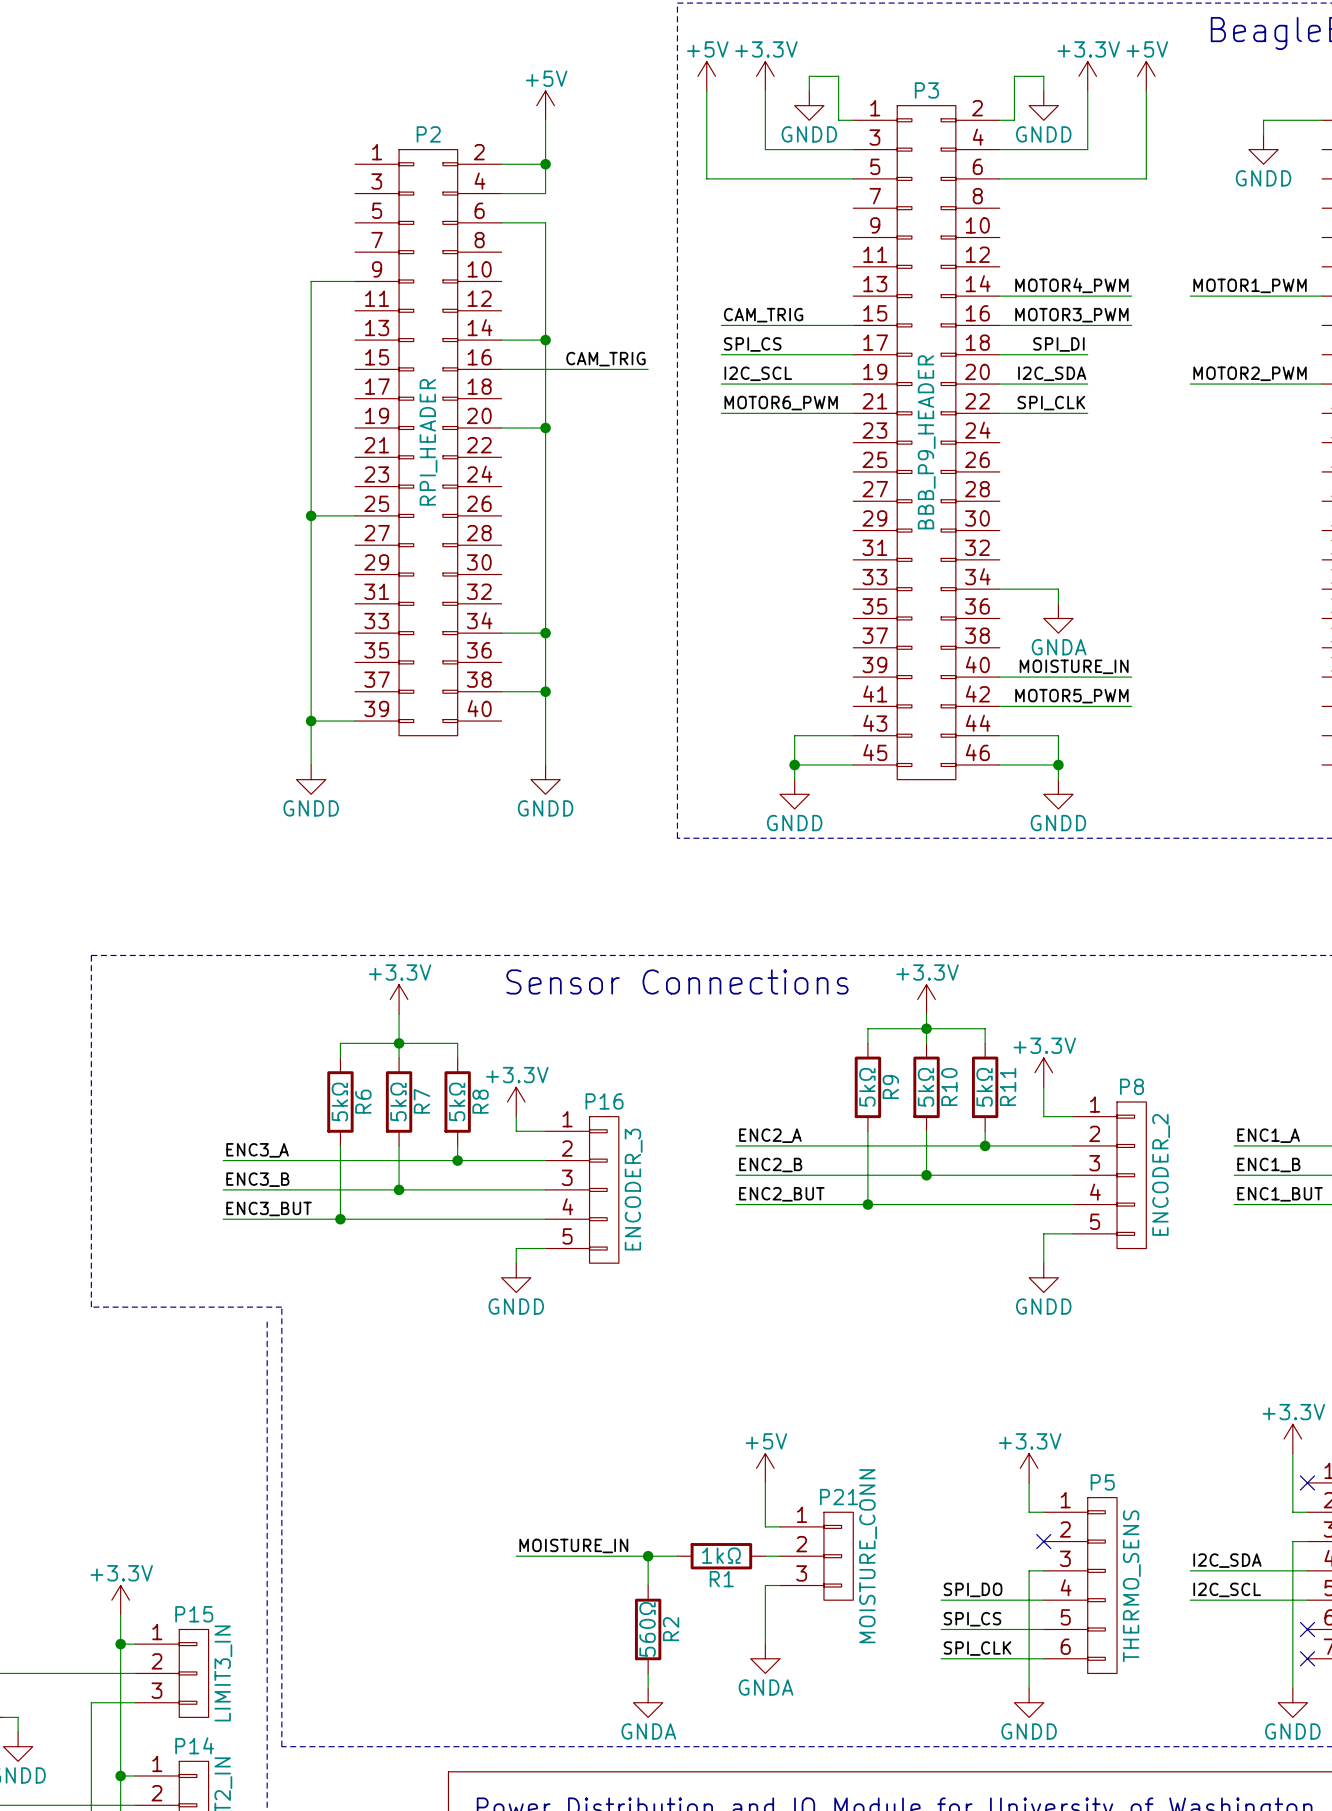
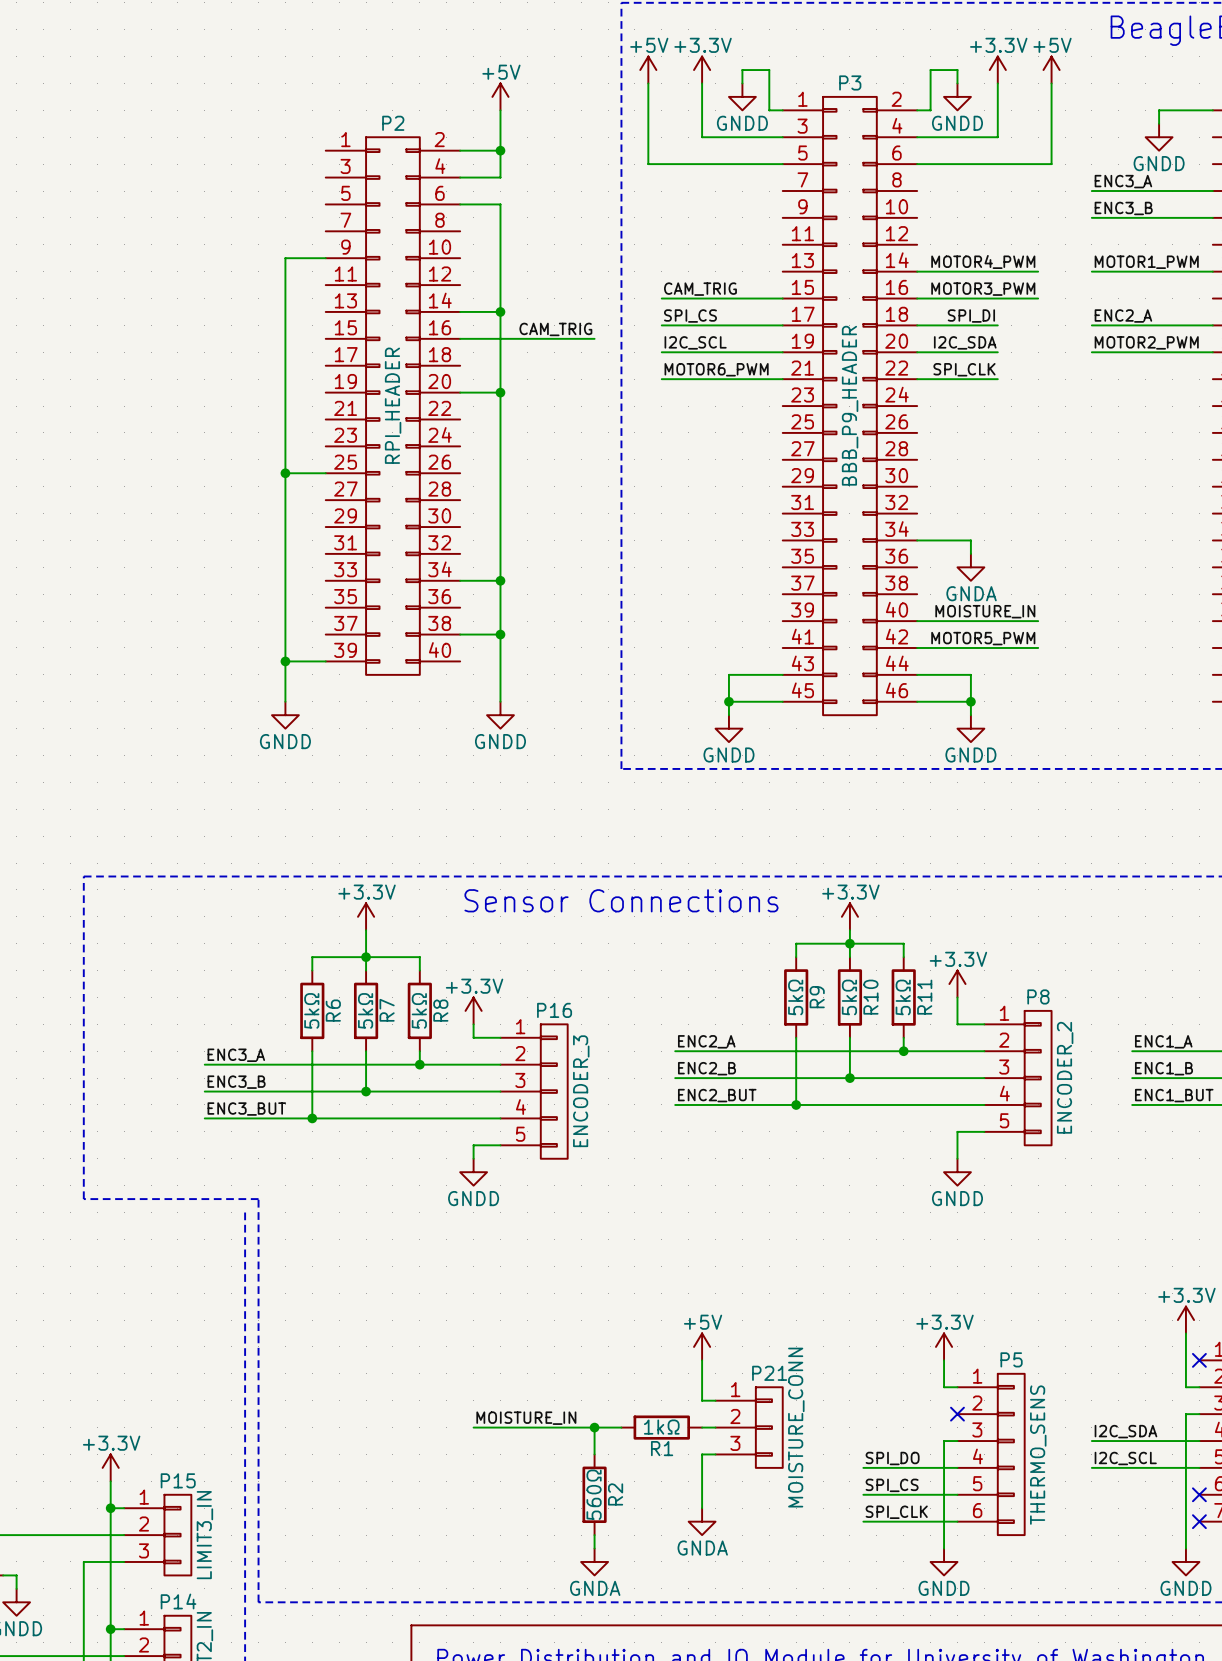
label: none -> ENC3_A (1123, 181)
wire: none -> (1091, 191) (1212, 191)
label: none -> ENC3_B (1123, 208)
wire: none -> (1091, 217) (1212, 217)
label: none -> ENC2_A (1123, 316)
wire: none -> (1091, 325) (1212, 325)

